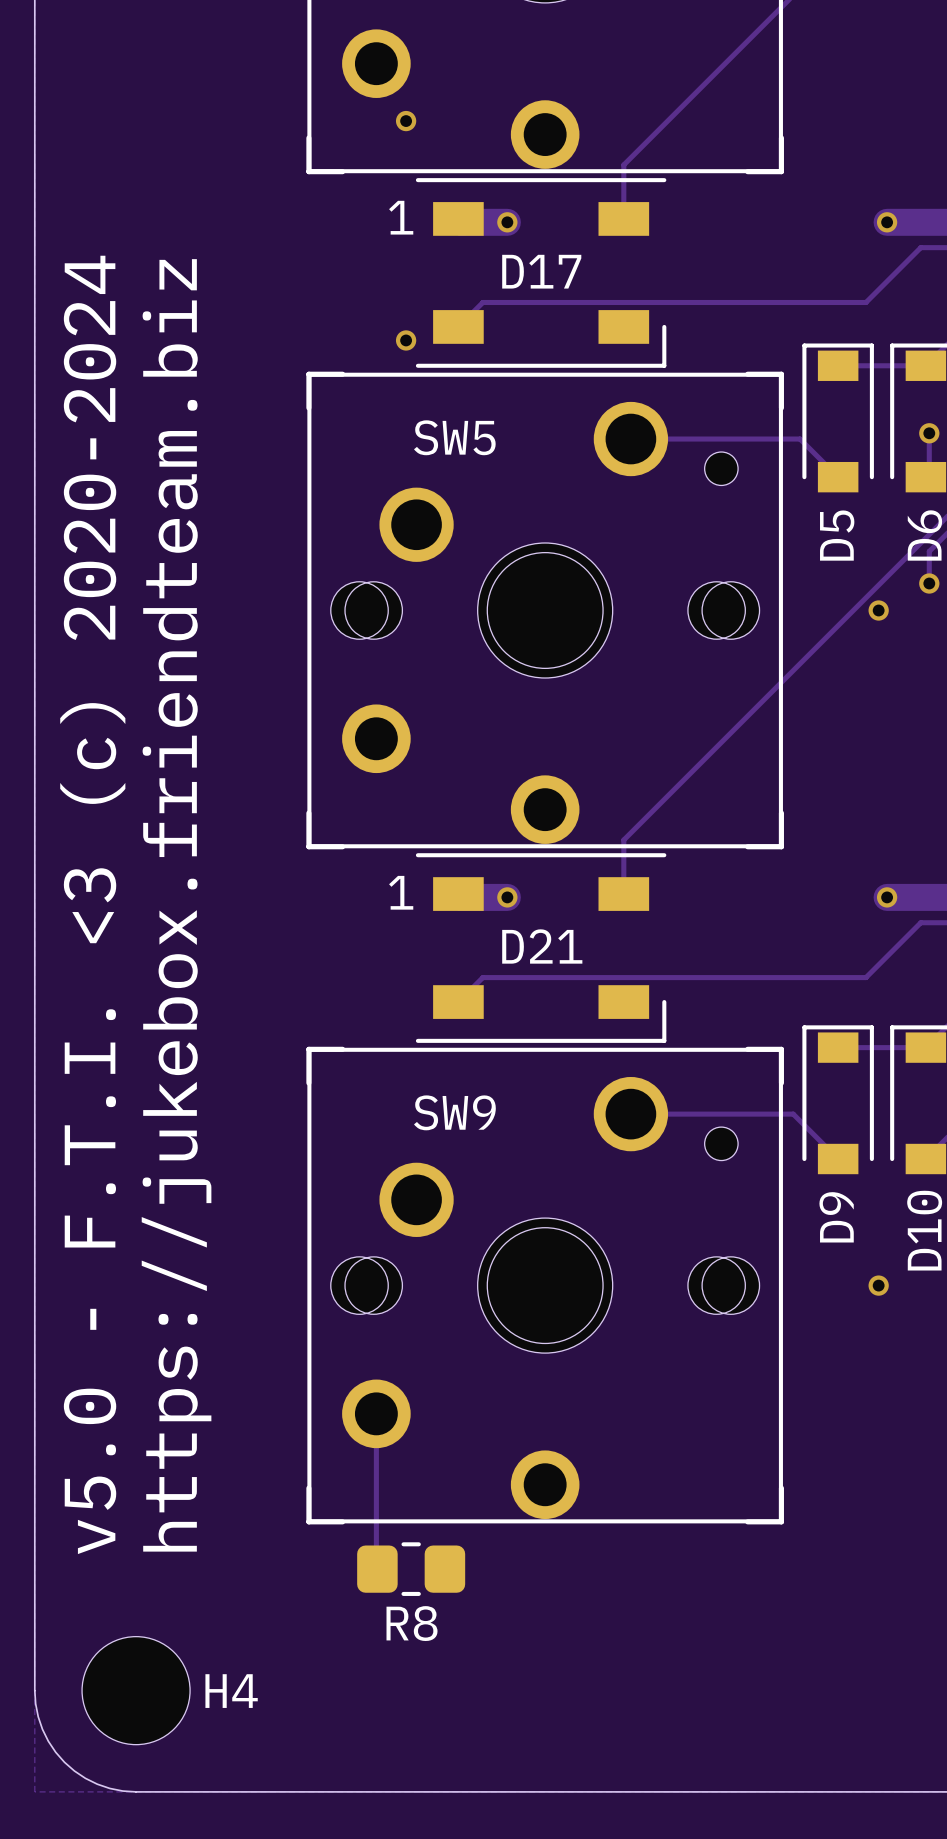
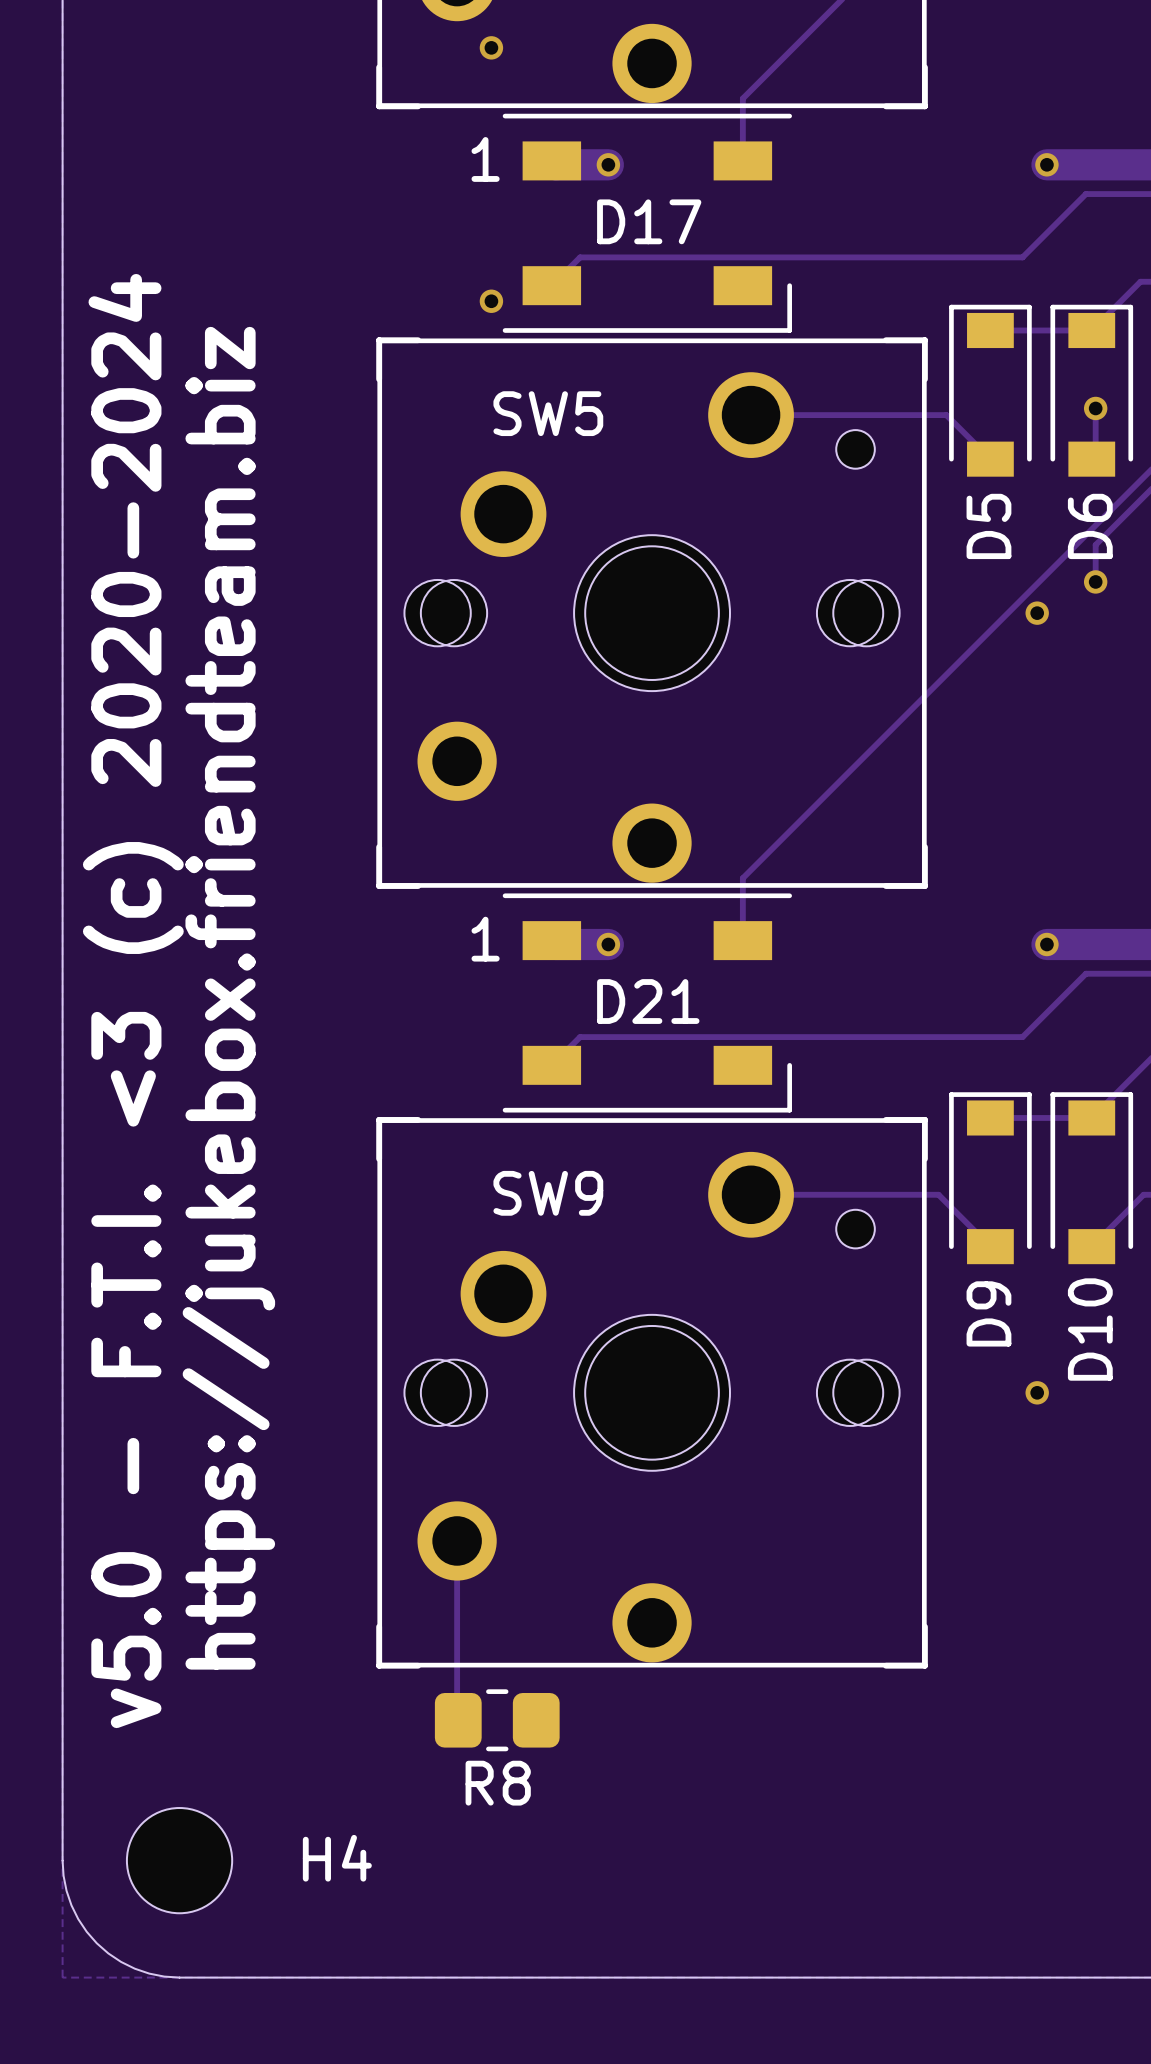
text position: v5.0 - F.T.I. <3 (c) 2020-2024 (92, 904) -> v5.0 - F.T.I. <3 (c) 2020-2024 (133, 1001)
text position: https://jukebox.friendteam.biz (176, 905) -> https://jukebox.friendteam.biz (228, 998)
H4 footprint: [82, 1636, 191, 1745] -> [126, 1808, 233, 1914]
H4 name position: H4 (231, 1691) -> H4 (337, 1858)

